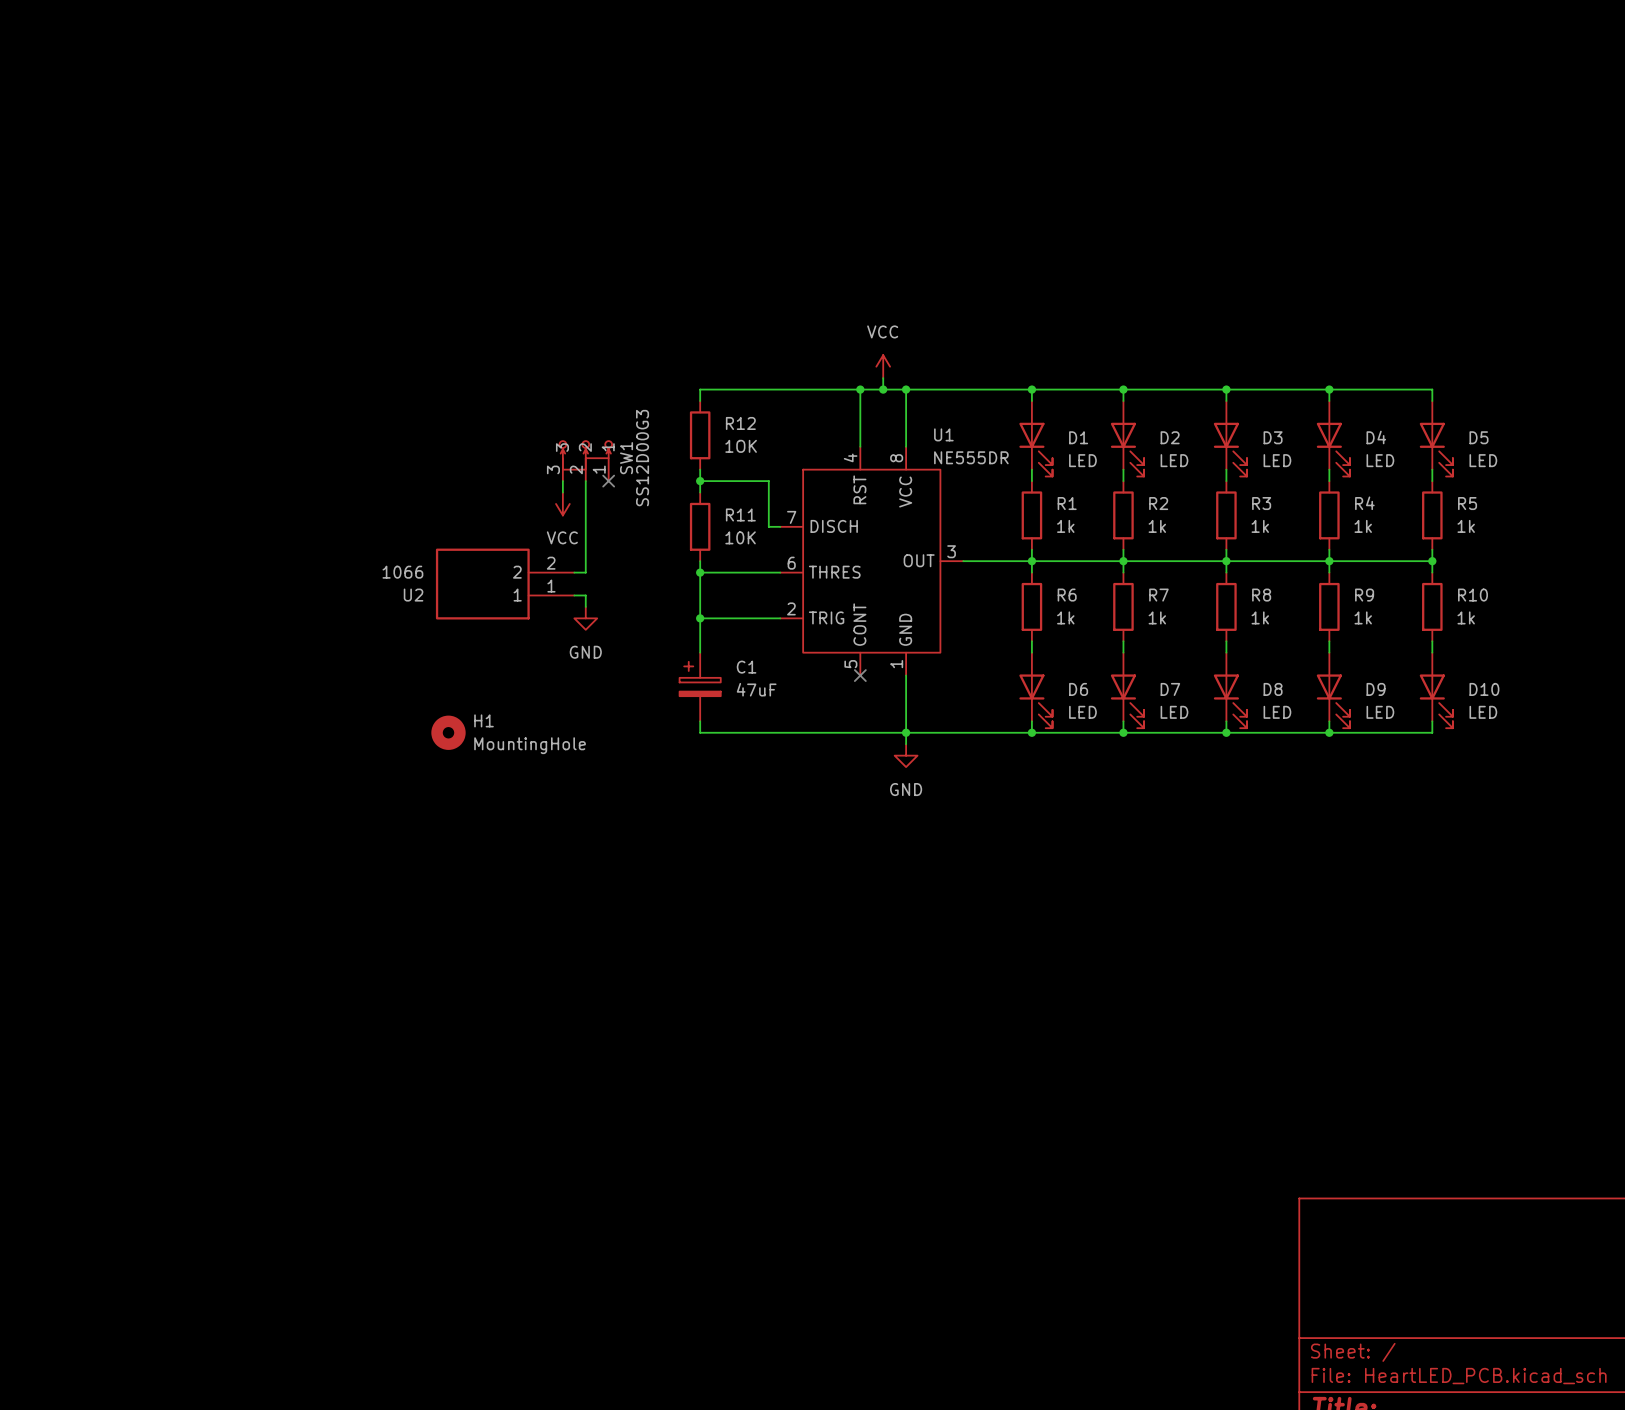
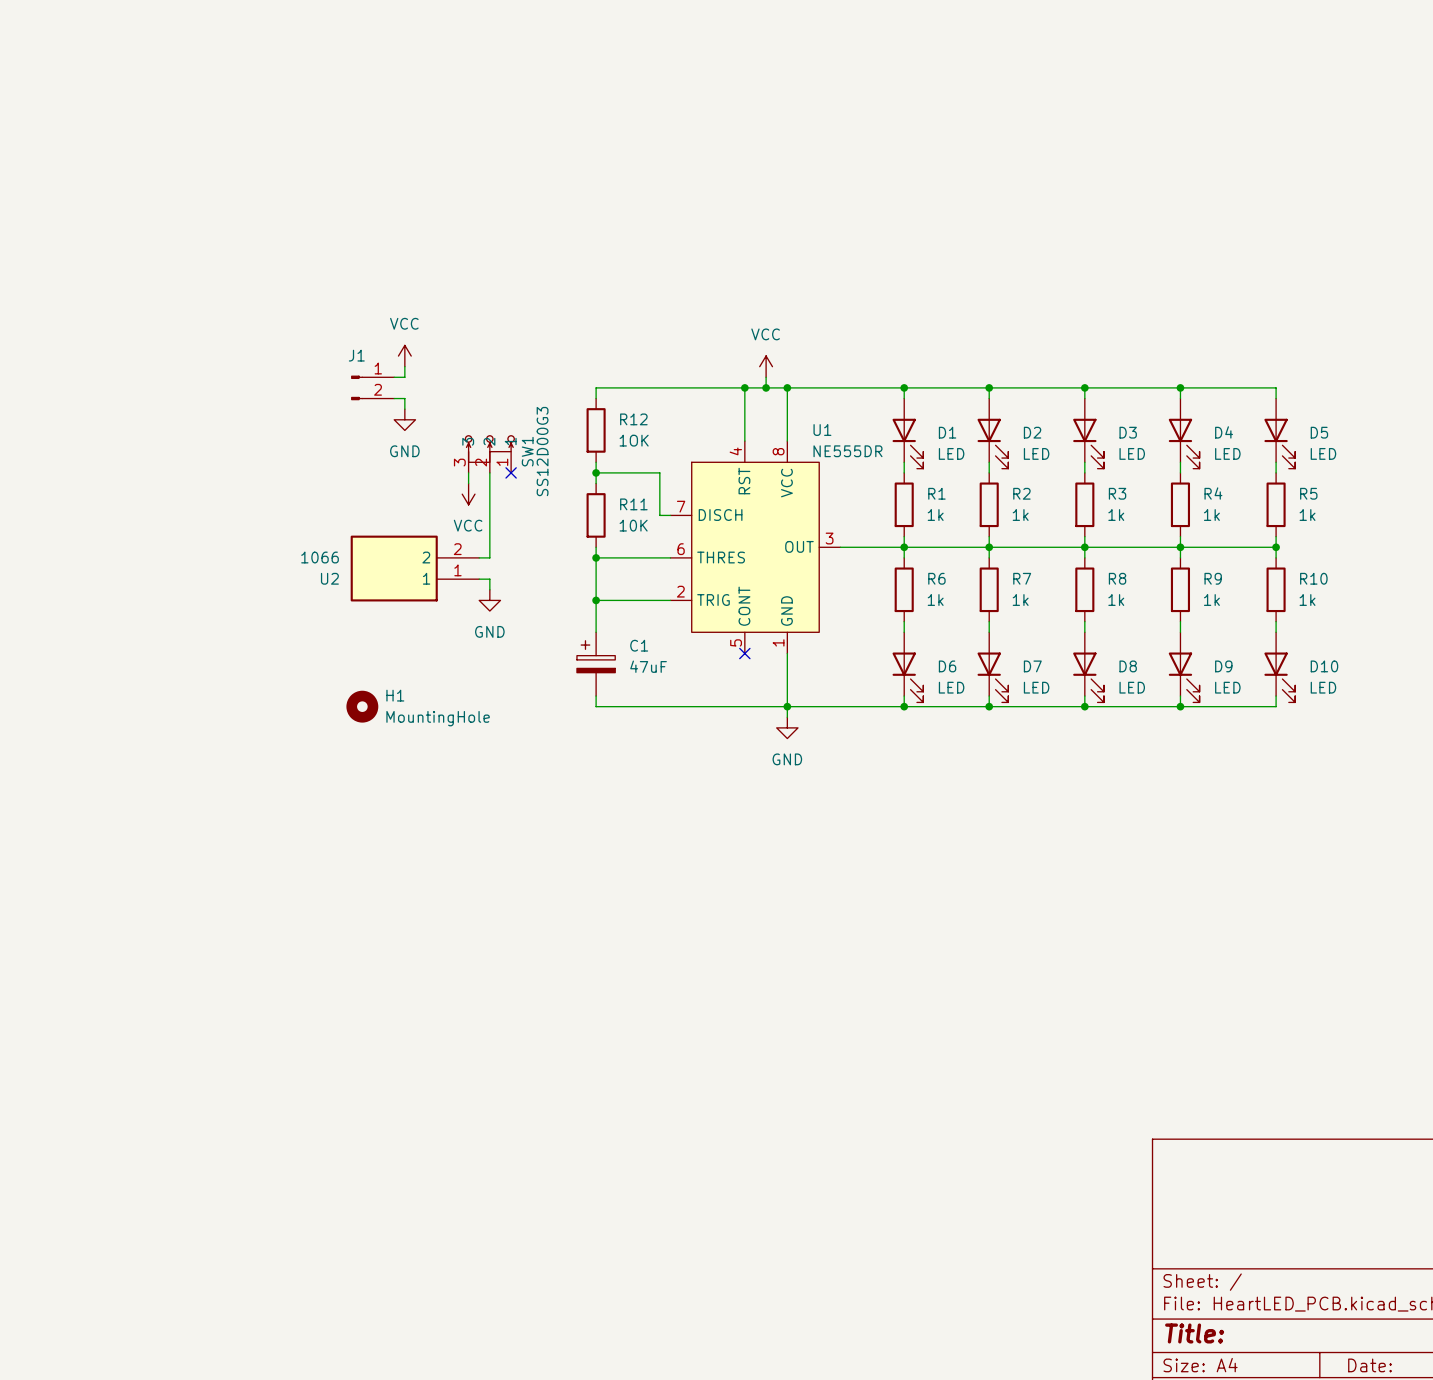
power symbol: none -> VCC (404, 356)
wire: none -> (404, 366) (404, 377) (394, 377)
J1: none -> (372, 387)
wire: none -> (394, 398) (404, 398) (404, 409)
power symbol: none -> GND (404, 419)

